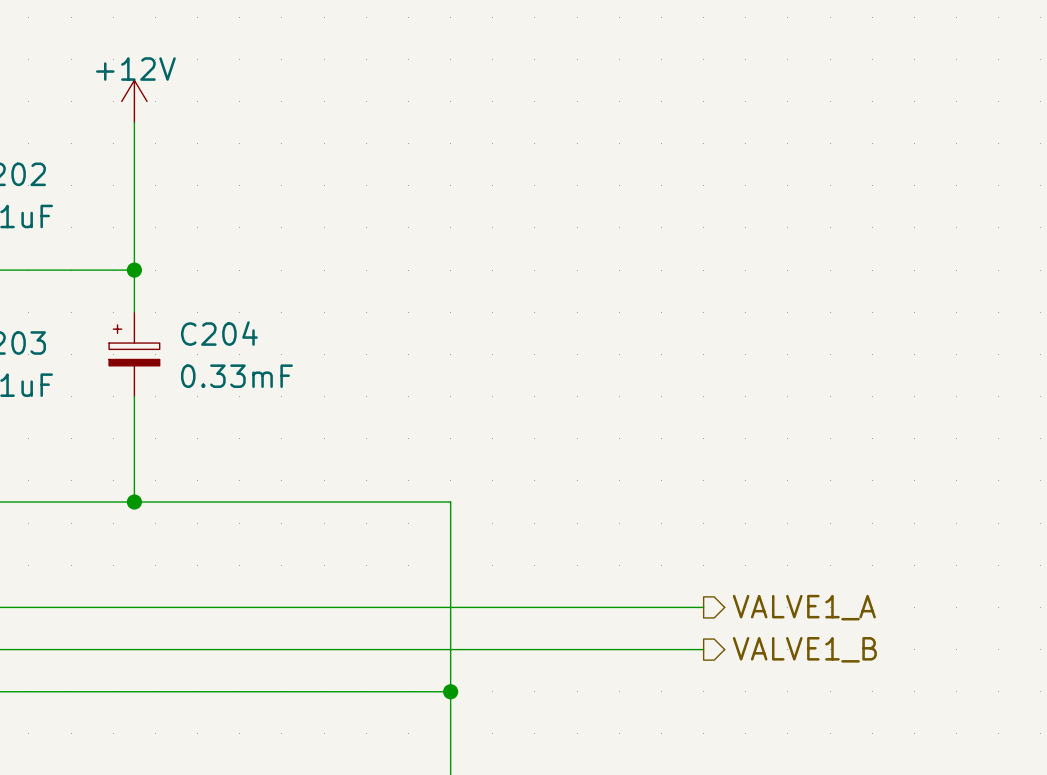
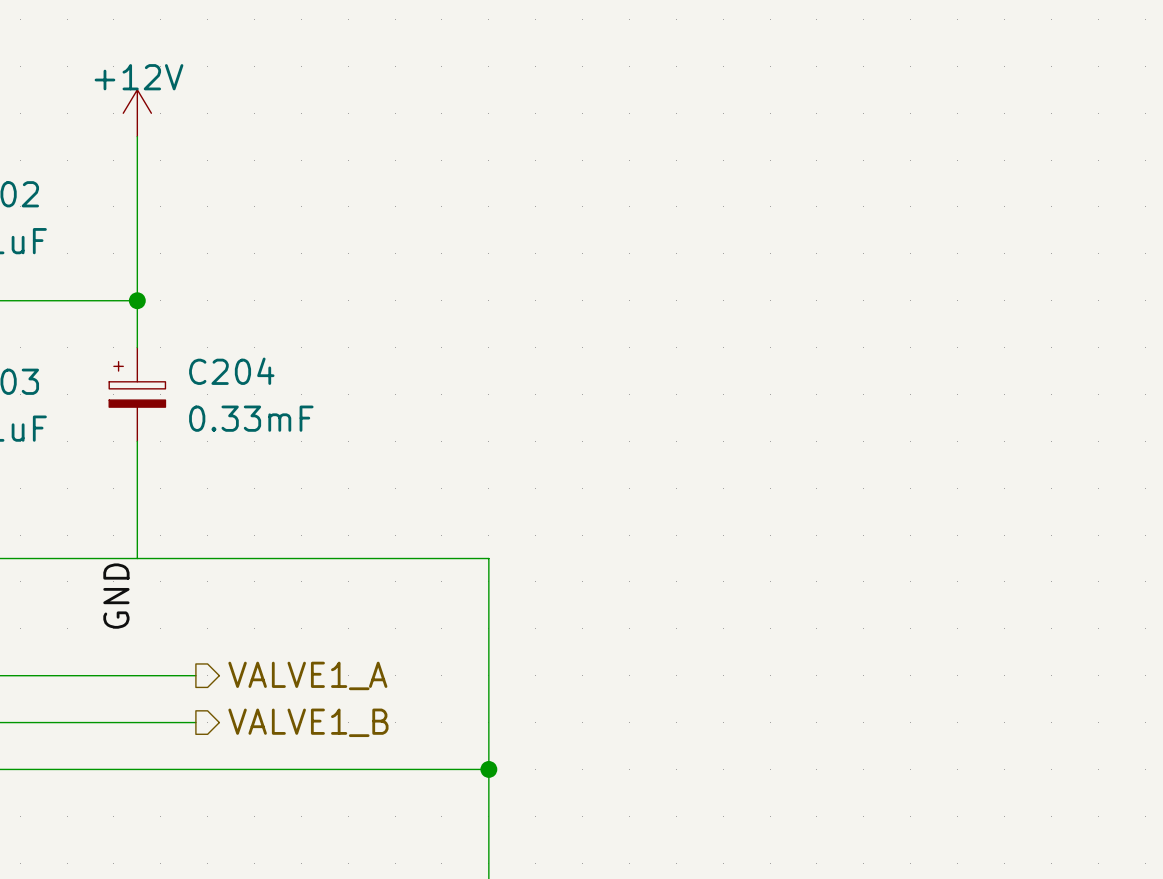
junction: (134, 502) -> none
label: none -> GND (116, 596)
wire: (187, 607) (703, 607) -> none
hierarchical label: none -> VALVE1_A (307, 675)
hierarchical label: VALVE1_A (804, 607) -> none
wire: (187, 649) (703, 649) -> none
hierarchical label: none -> VALVE1_B (308, 722)
hierarchical label: VALVE1_B (804, 649) -> none

